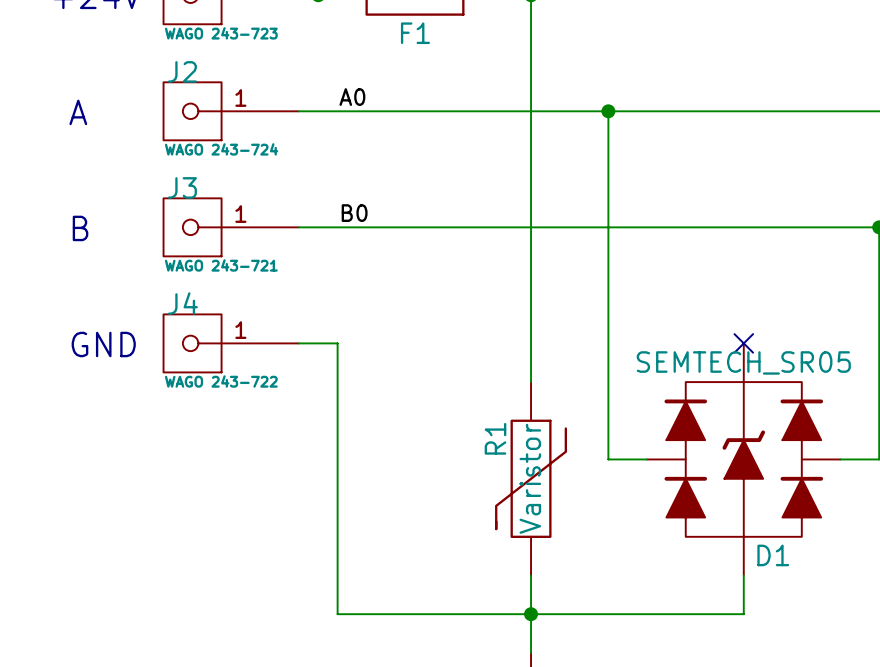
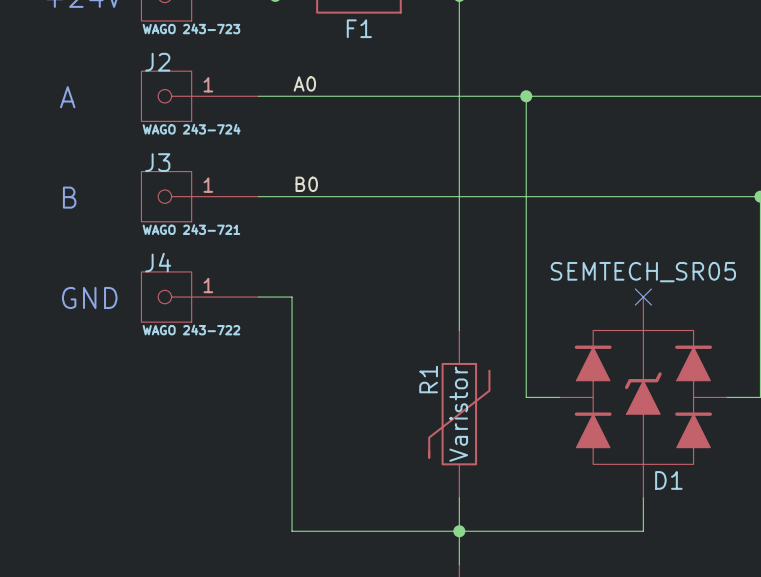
D1 value position: SEMTECH_SR05 (743, 362) -> SEMTECH_SR05 (643, 272)

